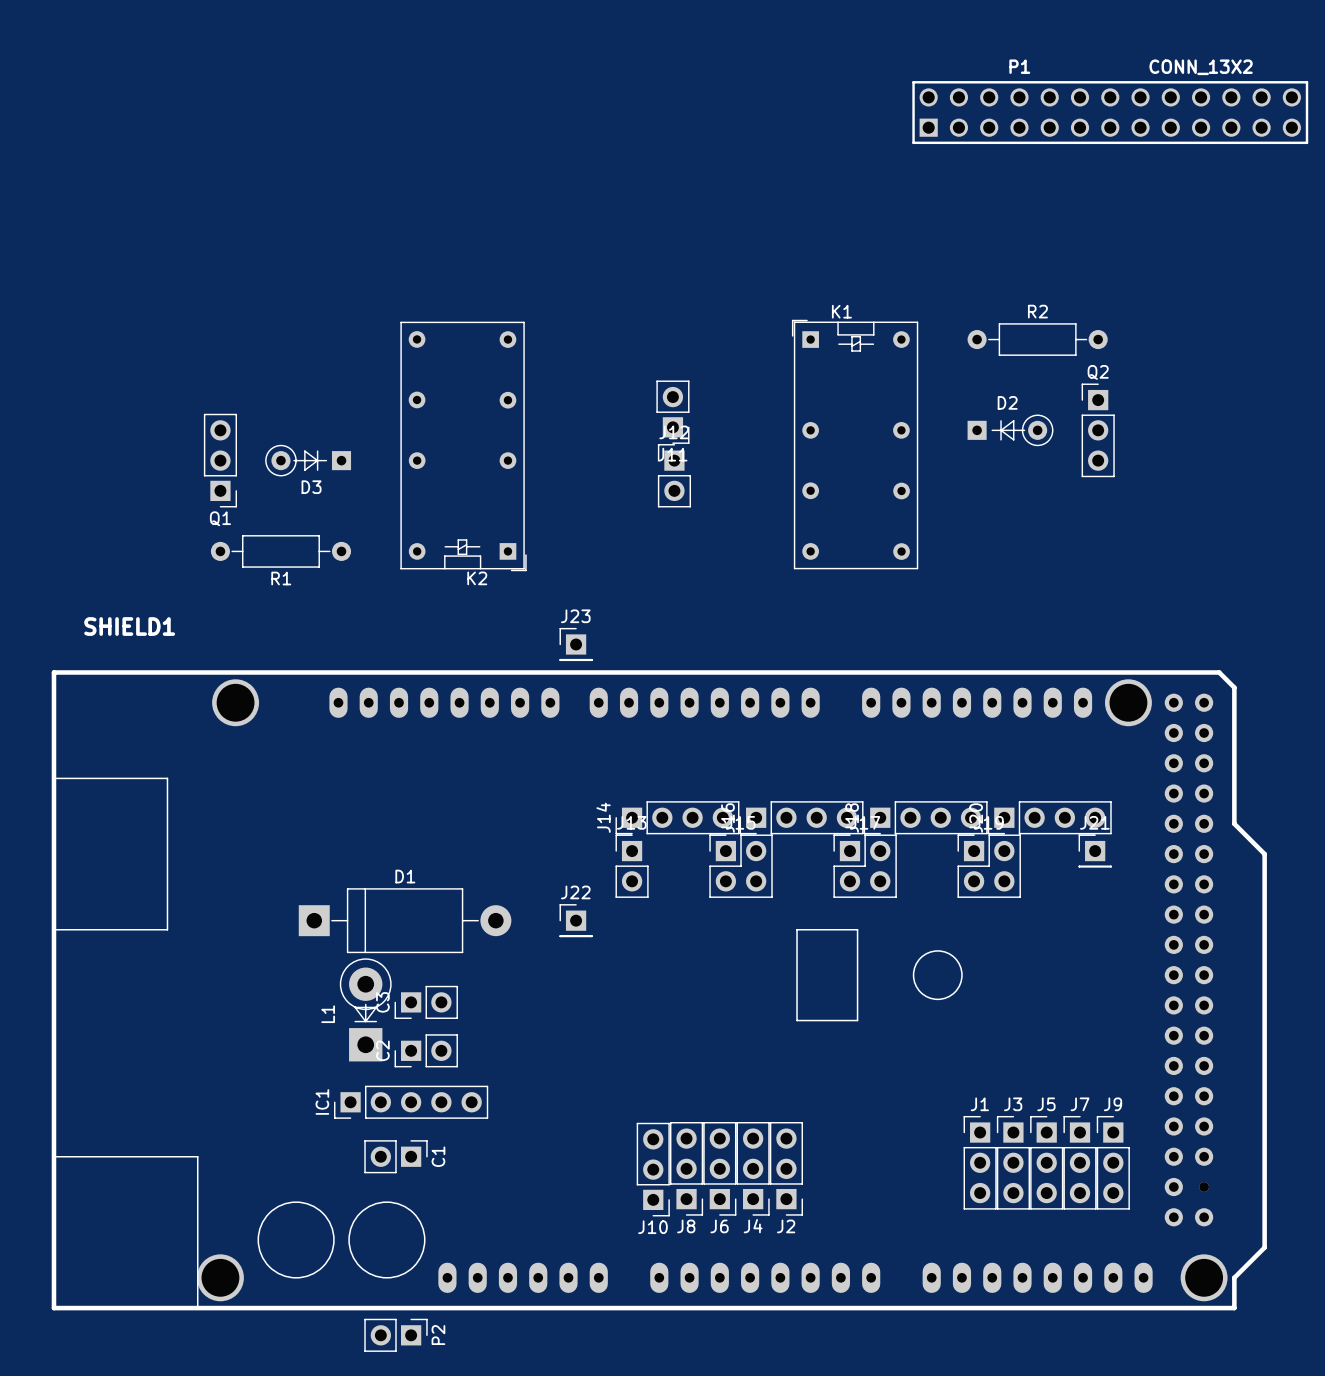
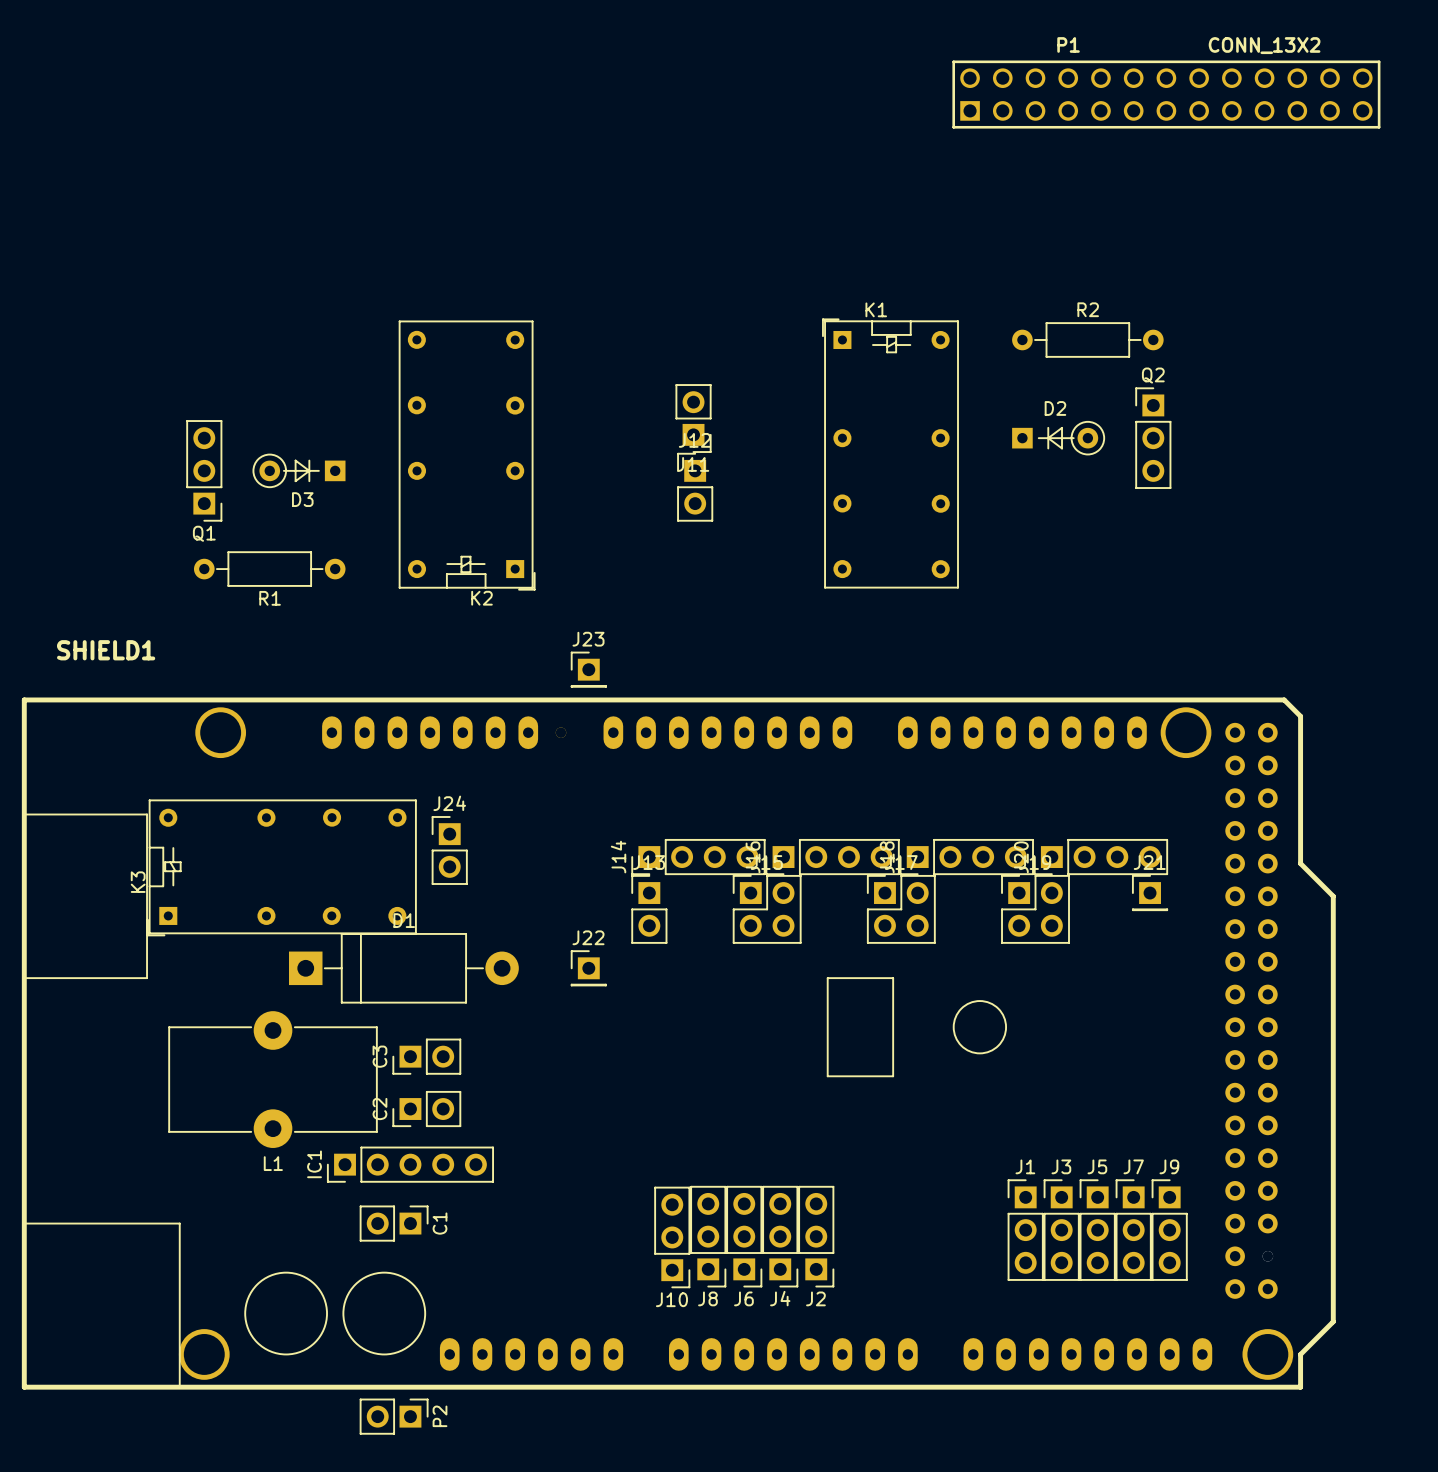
SHIELD1 footprint: [51, 670, 1267, 1311] -> [21, 697, 1336, 1390]
J24: none -> (449, 850)
K3: none -> (281, 867)
L1 footprint: [339, 958, 392, 1062] -> [168, 1011, 378, 1148]
L1 name position: L1 (328, 1014) -> L1 (273, 1163)

